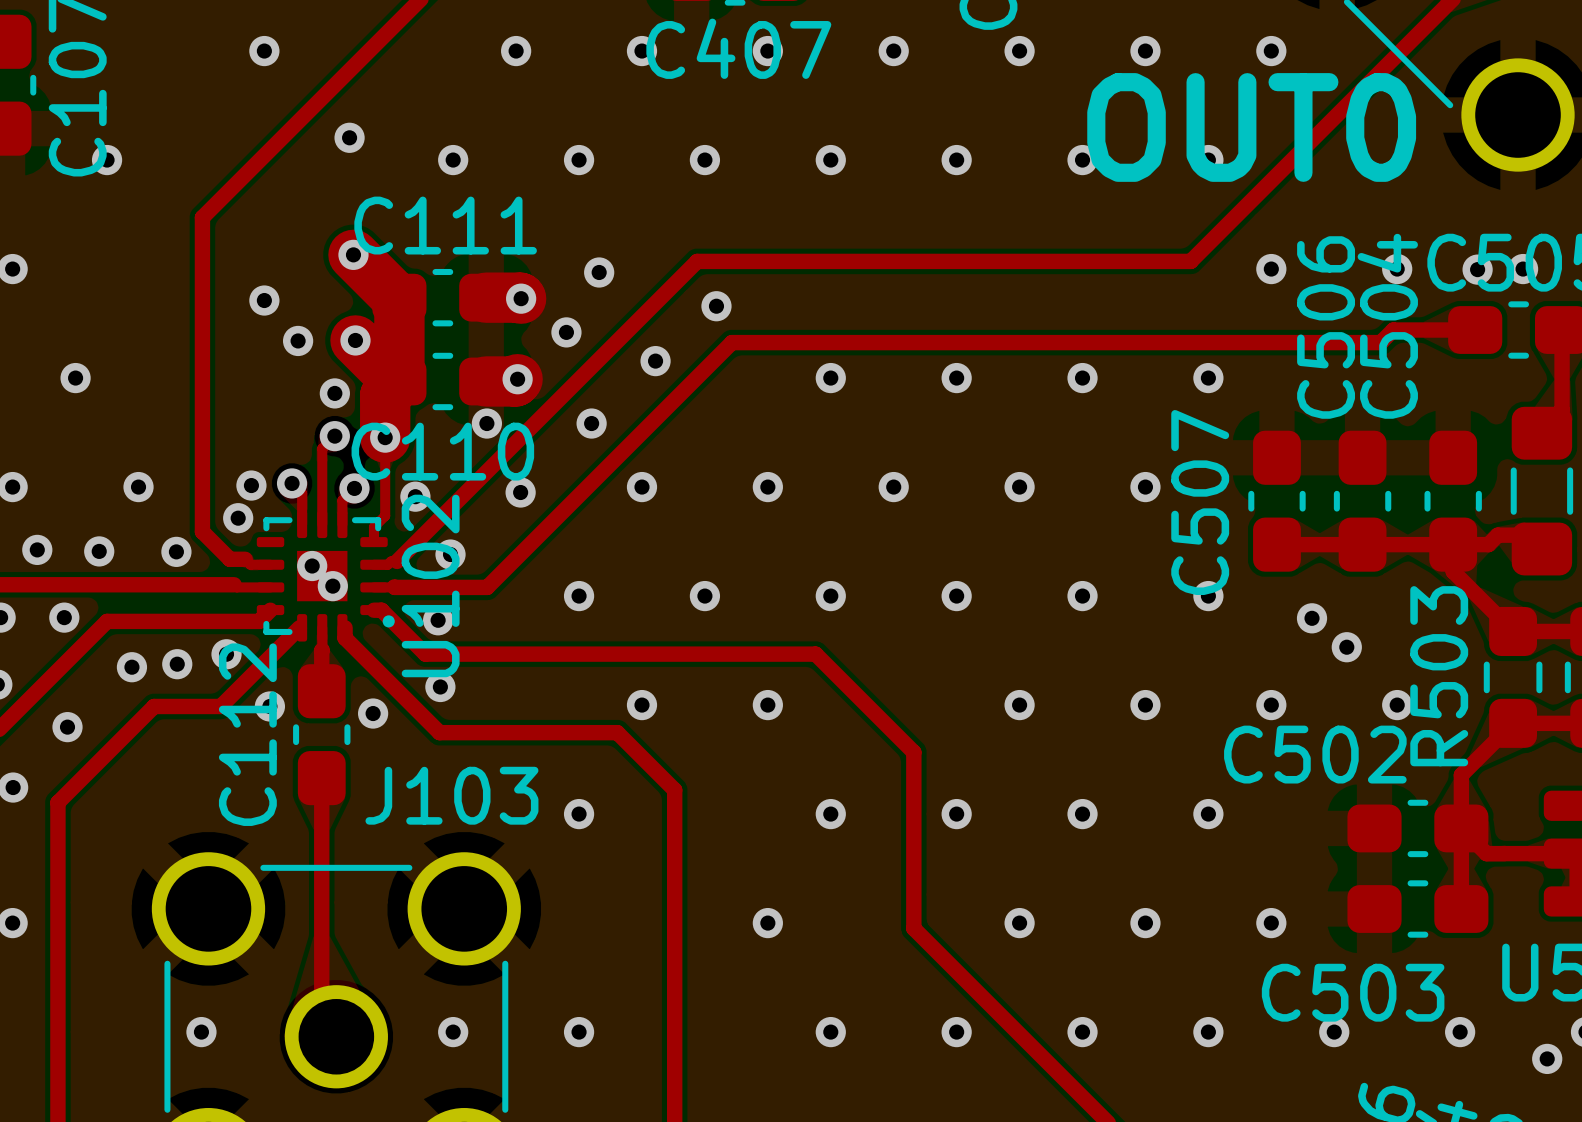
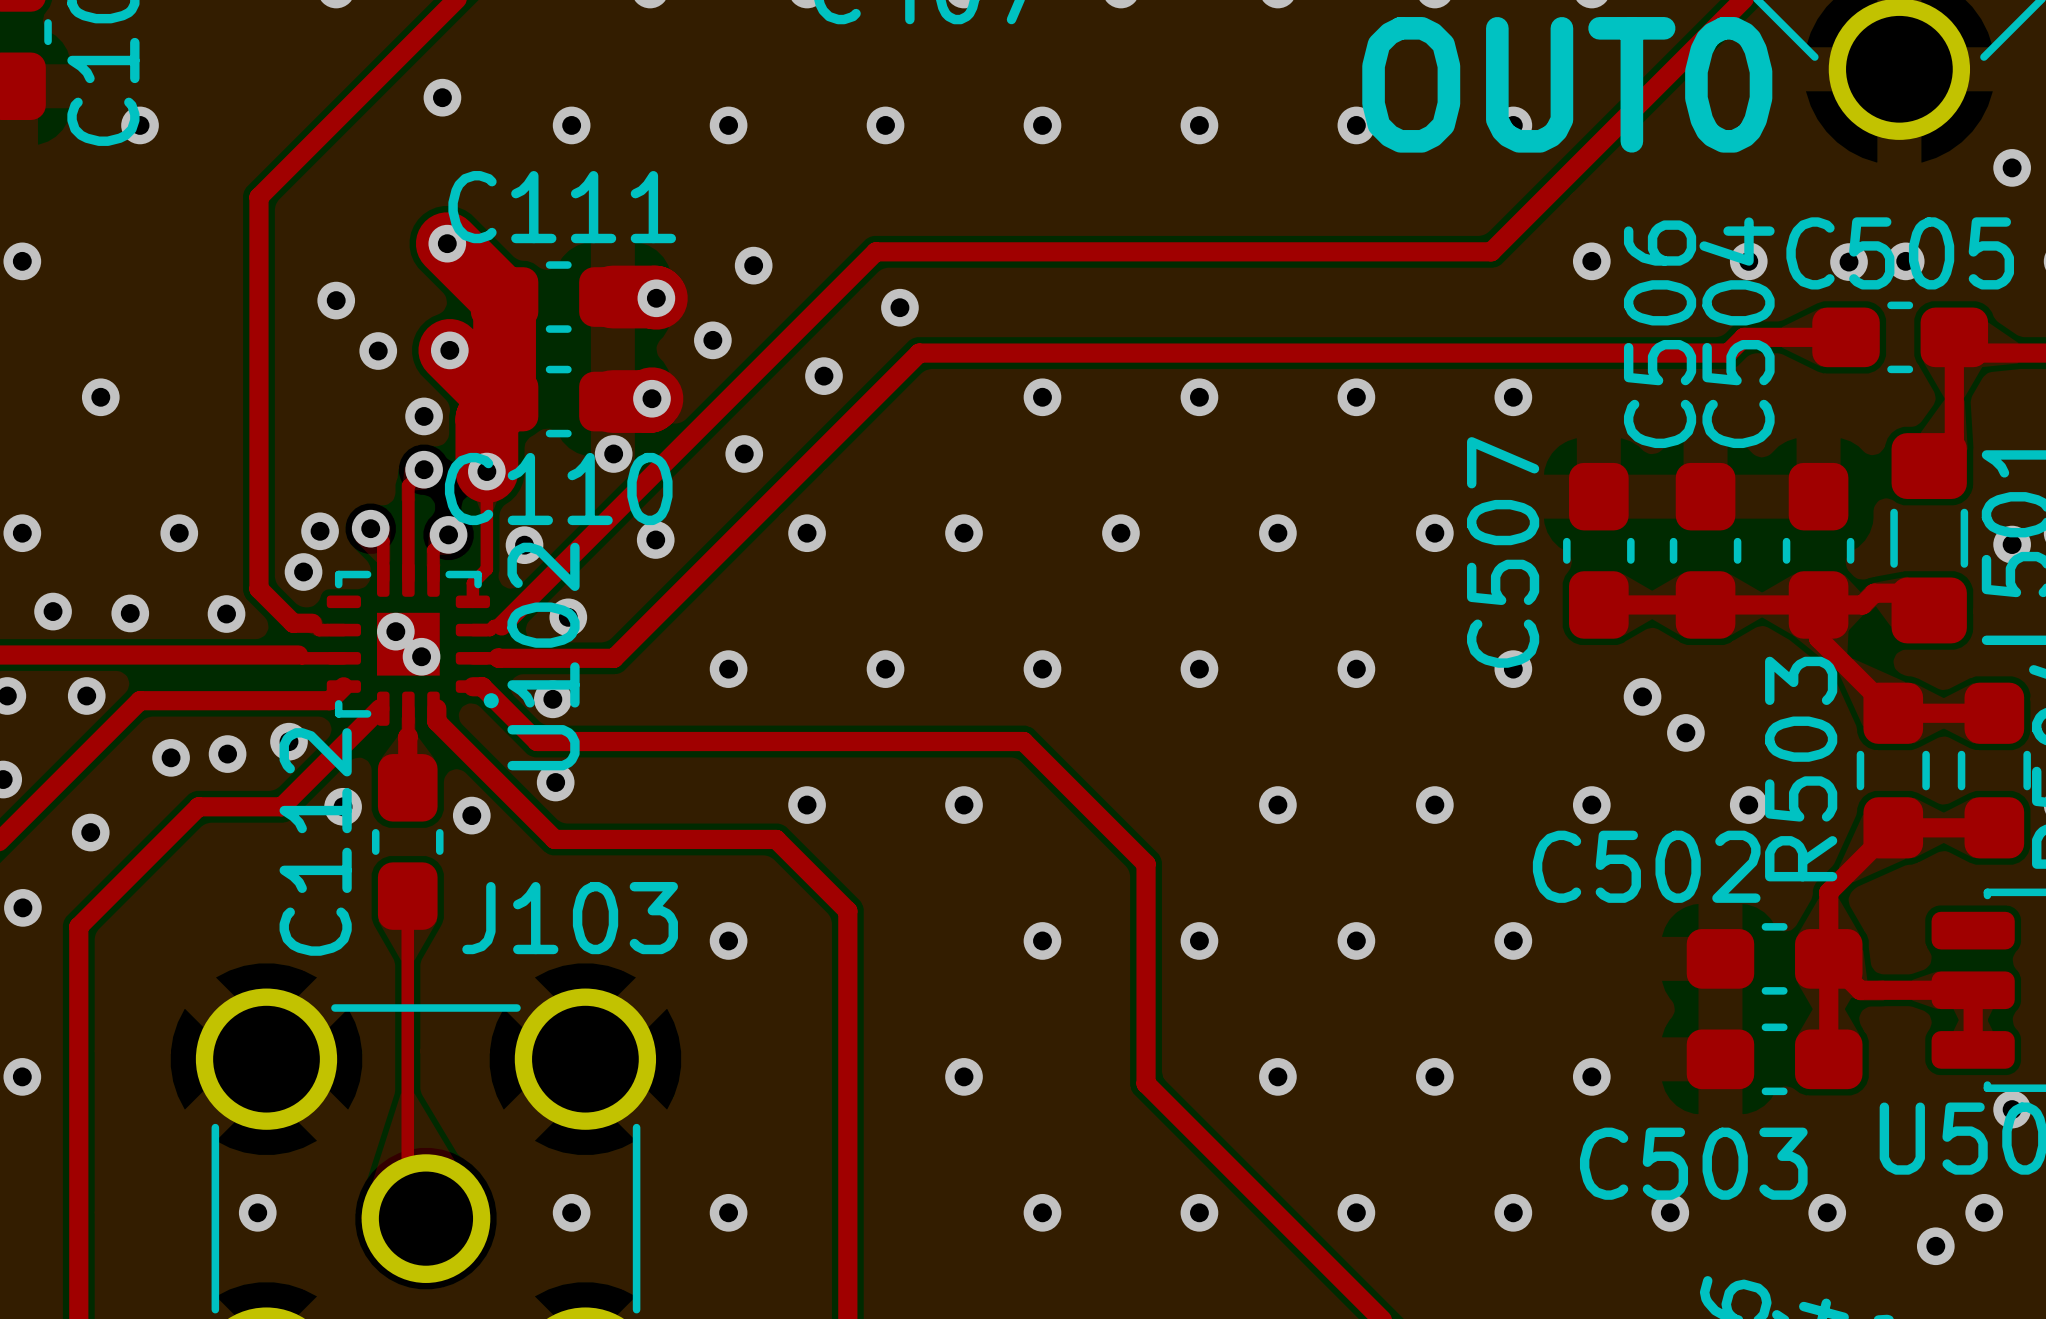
top track width: thick (321, 778) (321, 1022) (336, 1036) -> thin (407, 896) (407, 1200) (425, 1218)

